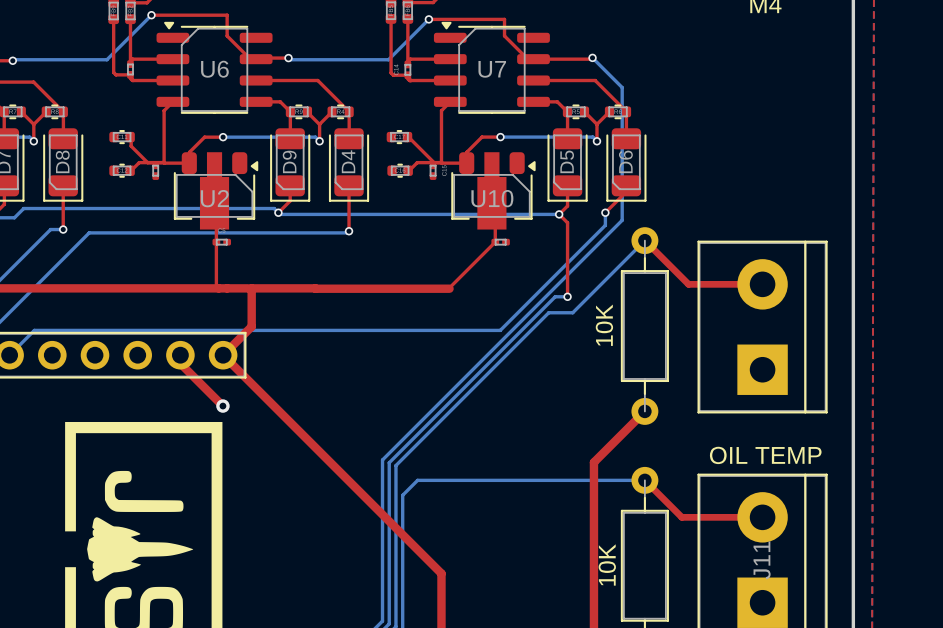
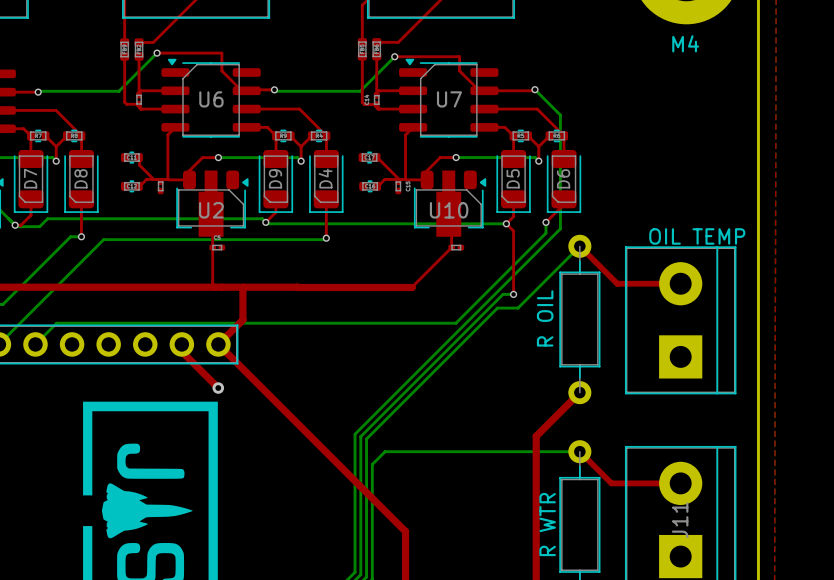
10K name: 10K (604, 325) -> R OIL (545, 318)
text position: OIL TEMP (765, 455) -> OIL TEMP (697, 236)
10K name: 10K (607, 564) -> R WTR (547, 524)

